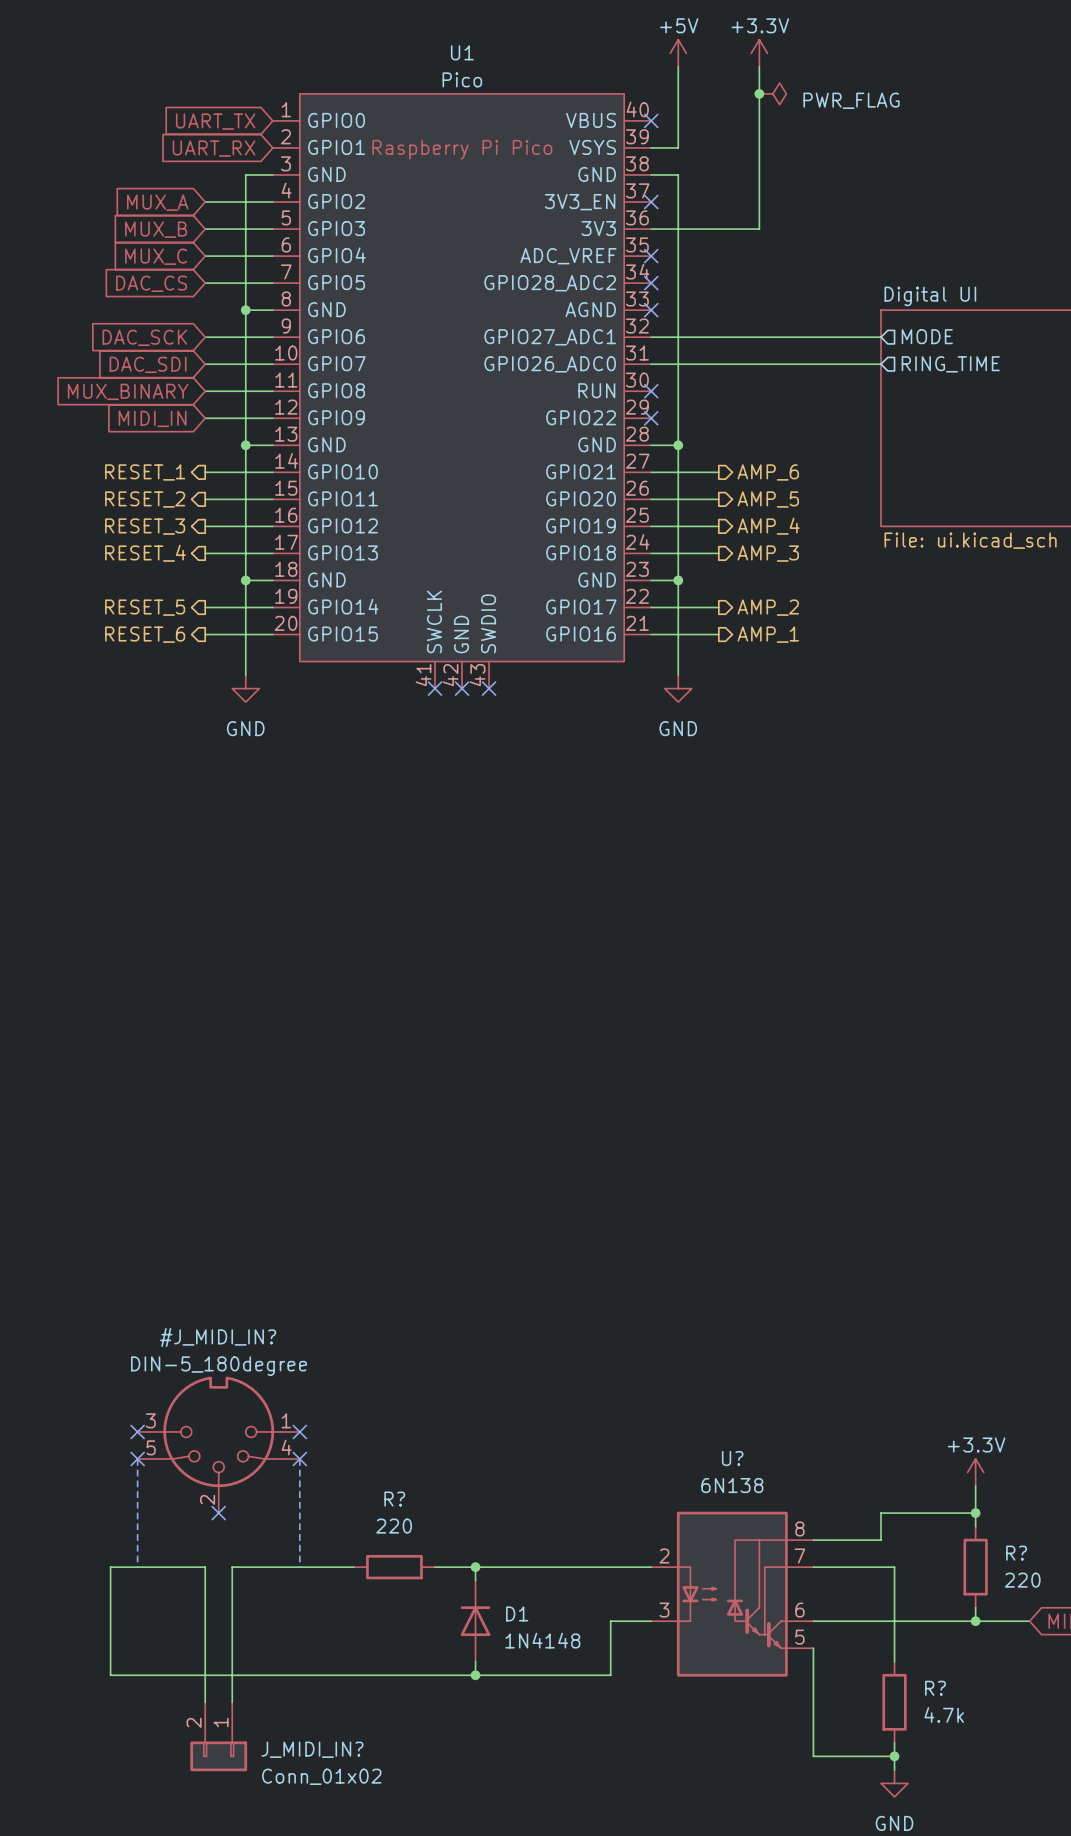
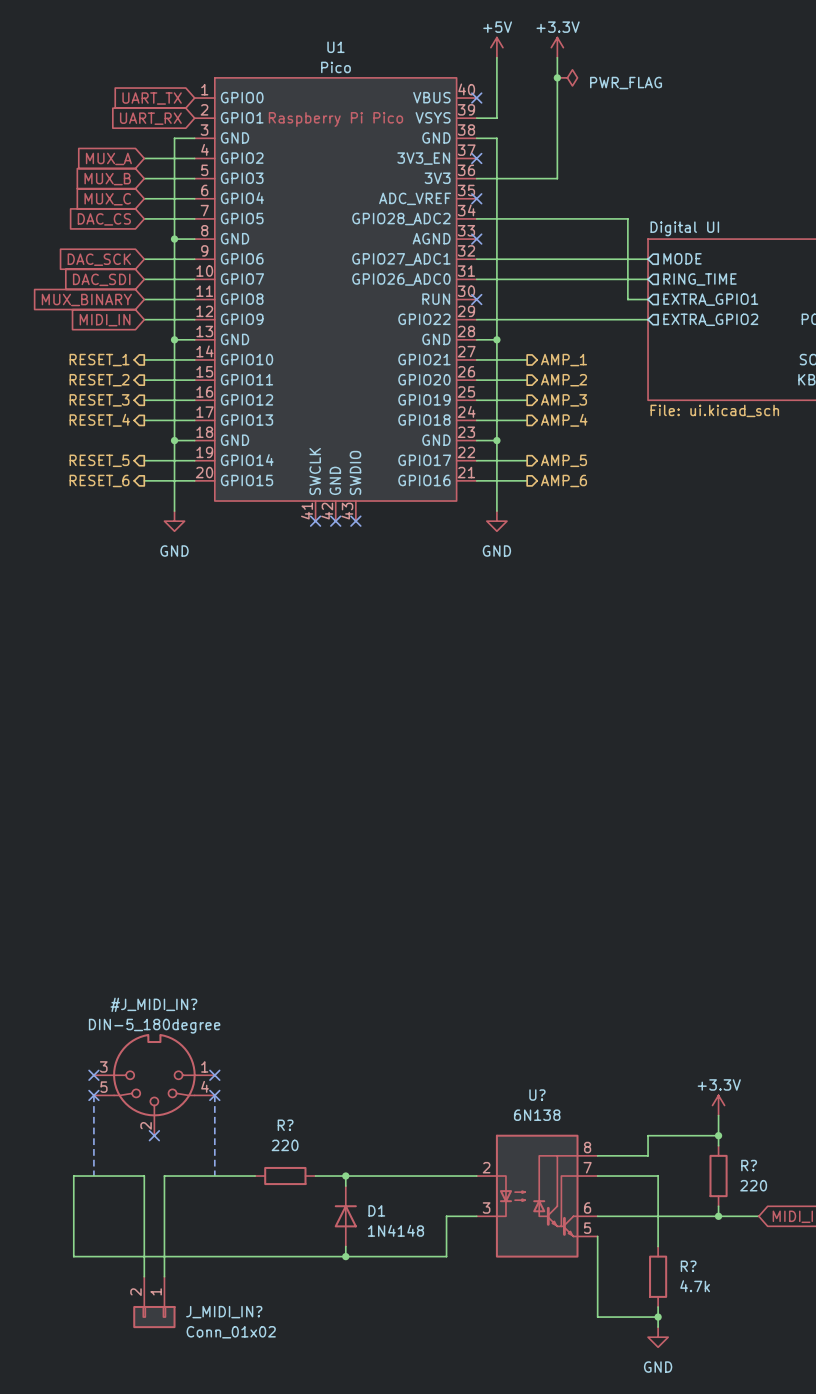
wire: none -> (476, 218) (627, 218) (627, 299) (648, 299)
no-connect mark: (651, 283) -> none
sheet pin: none -> EXTRA_GPIO1 (710, 299)
wire: none -> (476, 319) (648, 319)
no-connect mark: (651, 418) -> none
sheet pin: none -> EXTRA_GPIO2 (710, 319)
hierarchical label: AMP_6 (768, 472) -> AMP_1 (563, 360)
hierarchical label: AMP_5 (768, 499) -> AMP_2 (563, 380)
hierarchical label: AMP_4 (768, 526) -> AMP_3 (563, 400)
hierarchical label: AMP_3 (768, 553) -> AMP_4 (564, 420)
hierarchical label: AMP_2 (768, 607) -> AMP_5 (563, 460)
hierarchical label: AMP_1 (768, 634) -> AMP_6 (563, 480)

